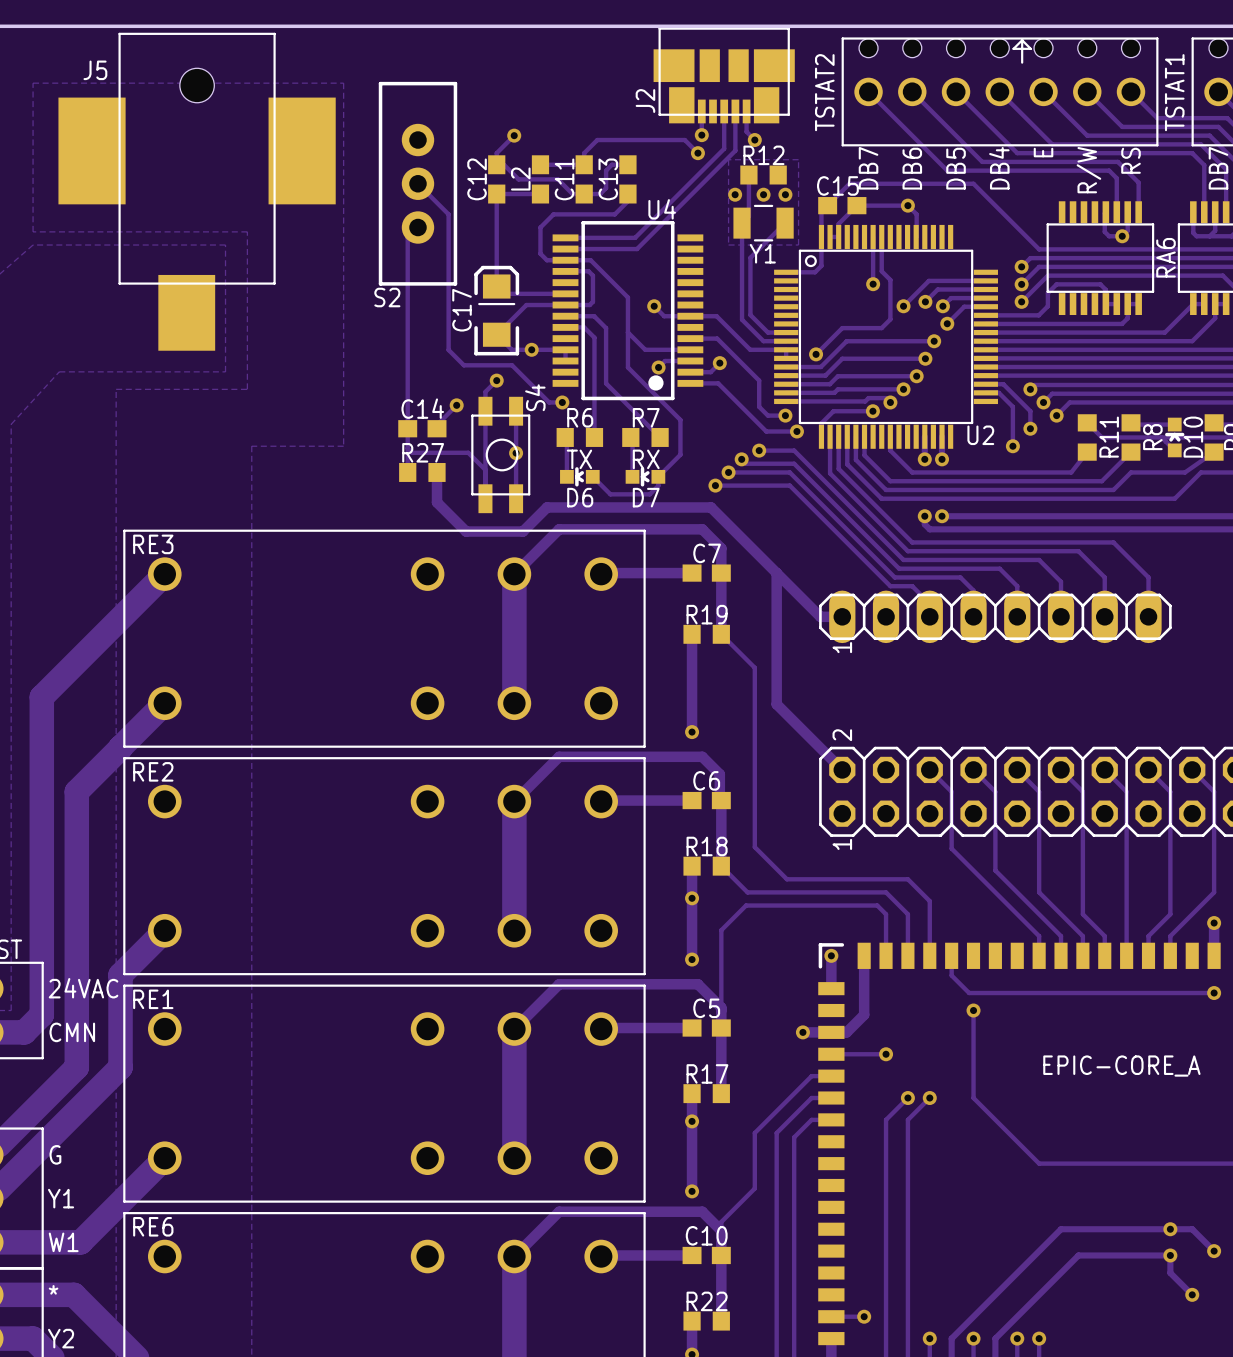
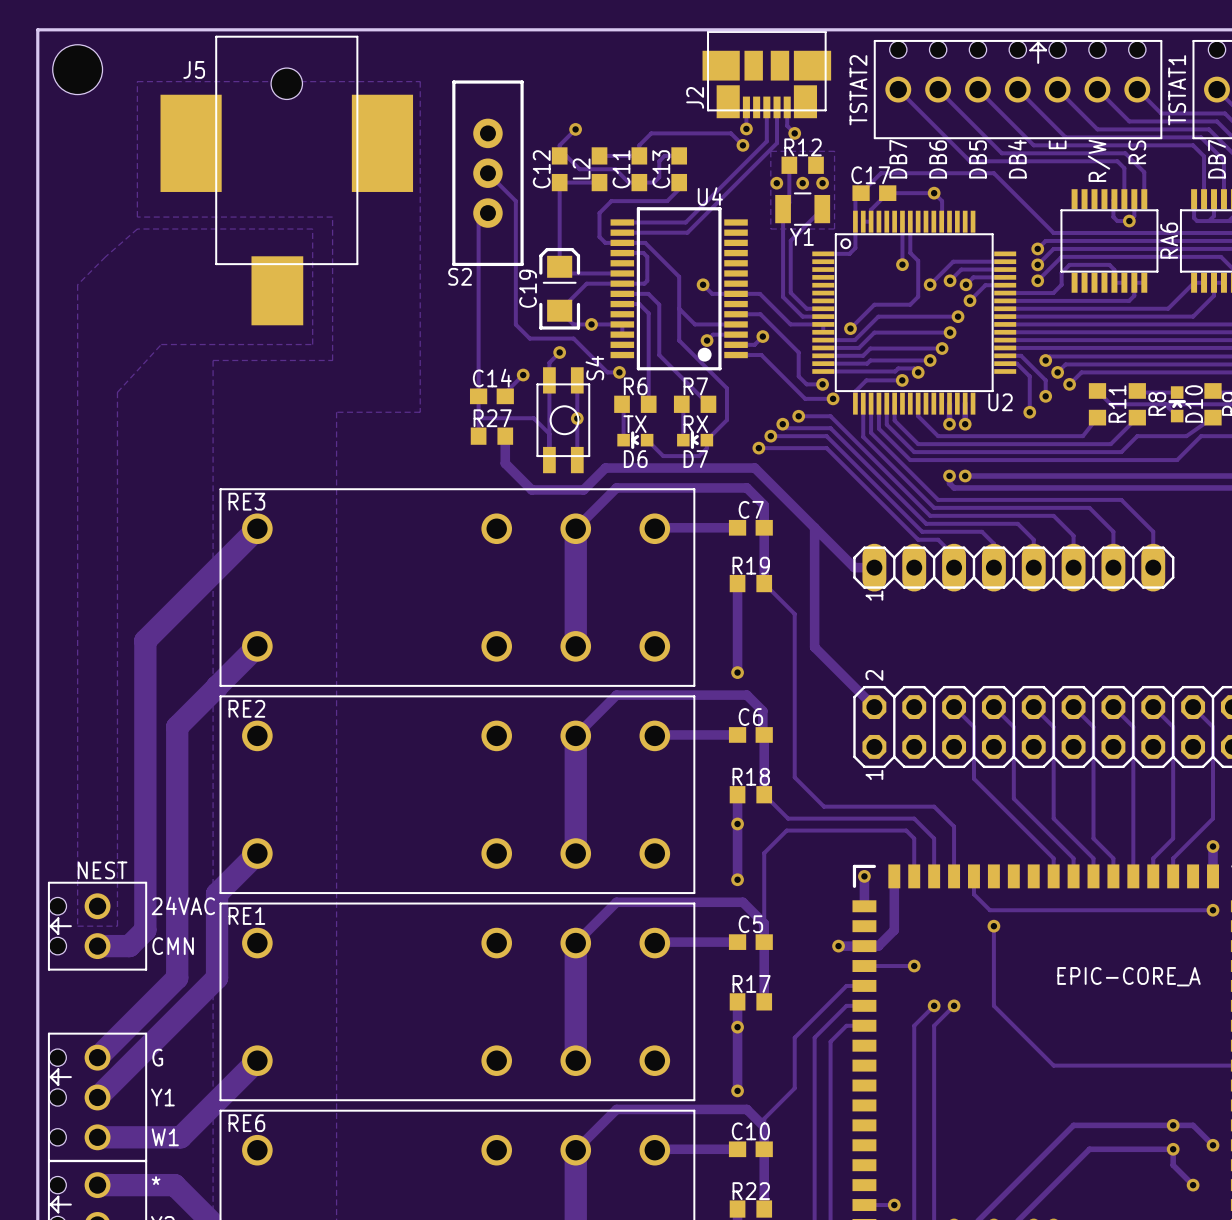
C15 name: C15 (837, 185) -> C17 (870, 175)
C17 name: C17 (462, 310) -> C19 (528, 288)

